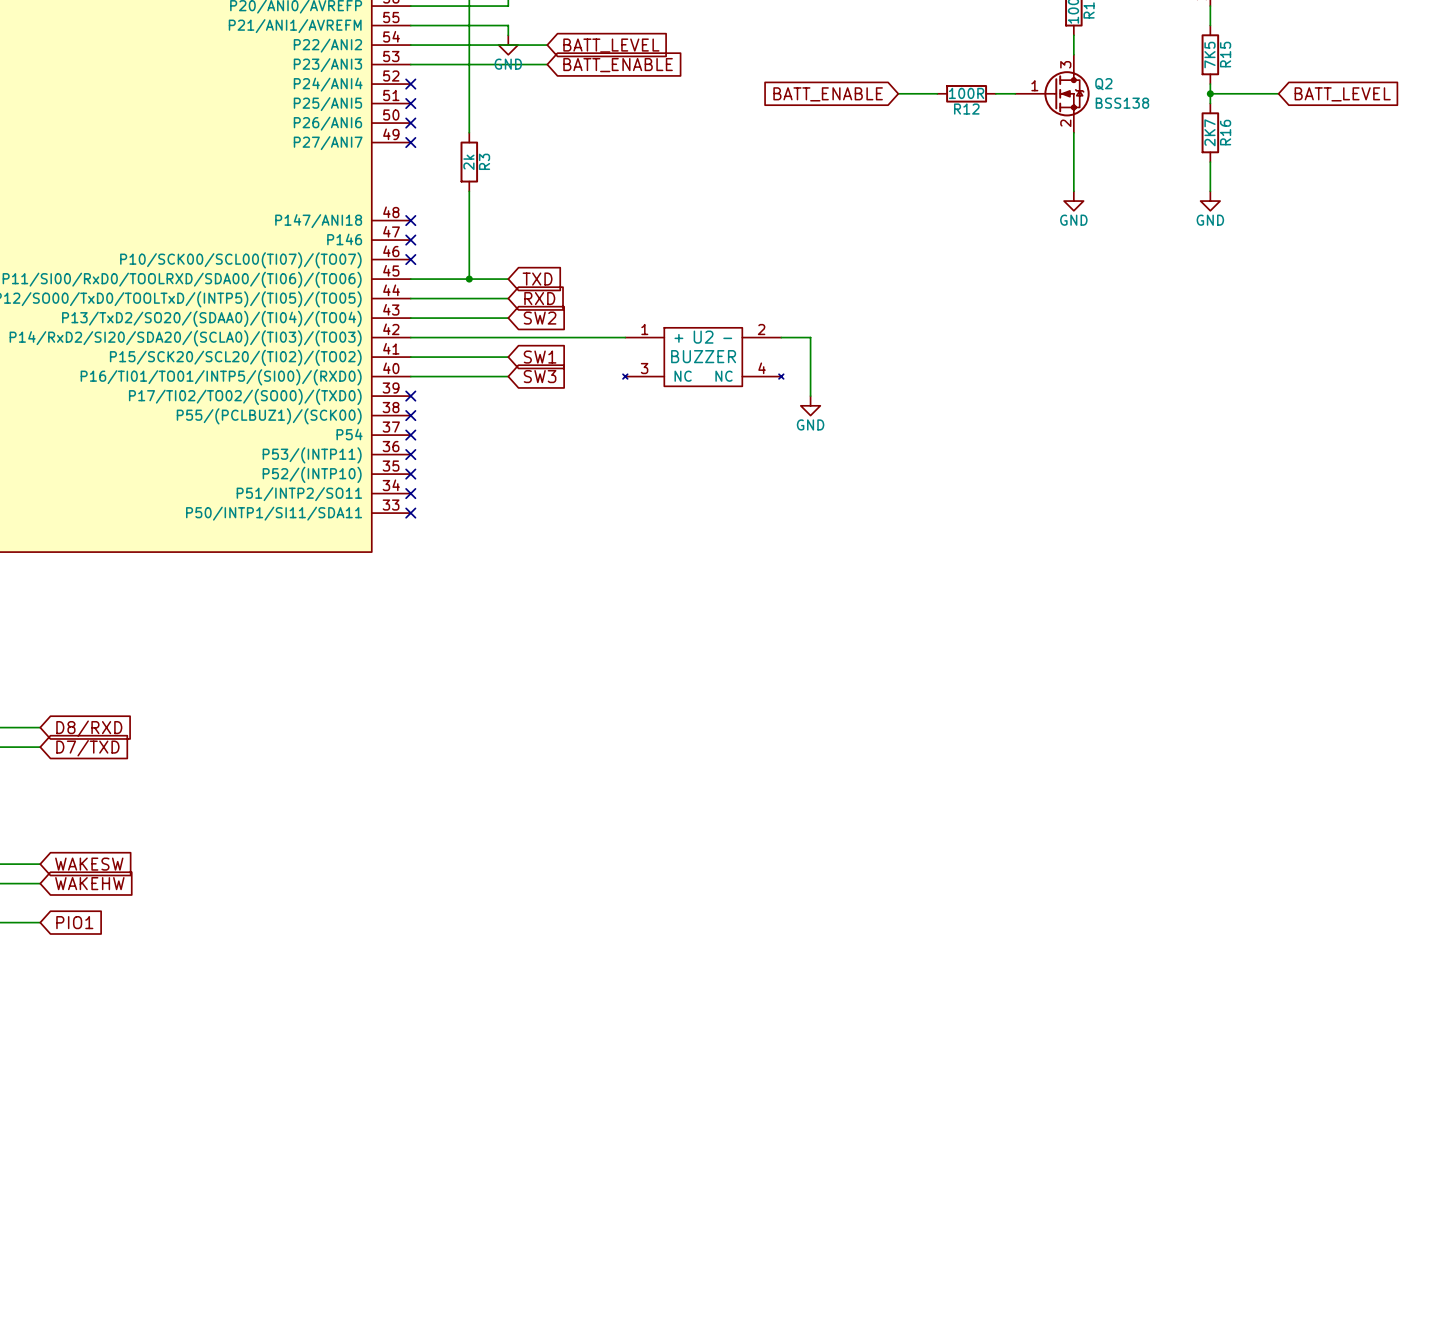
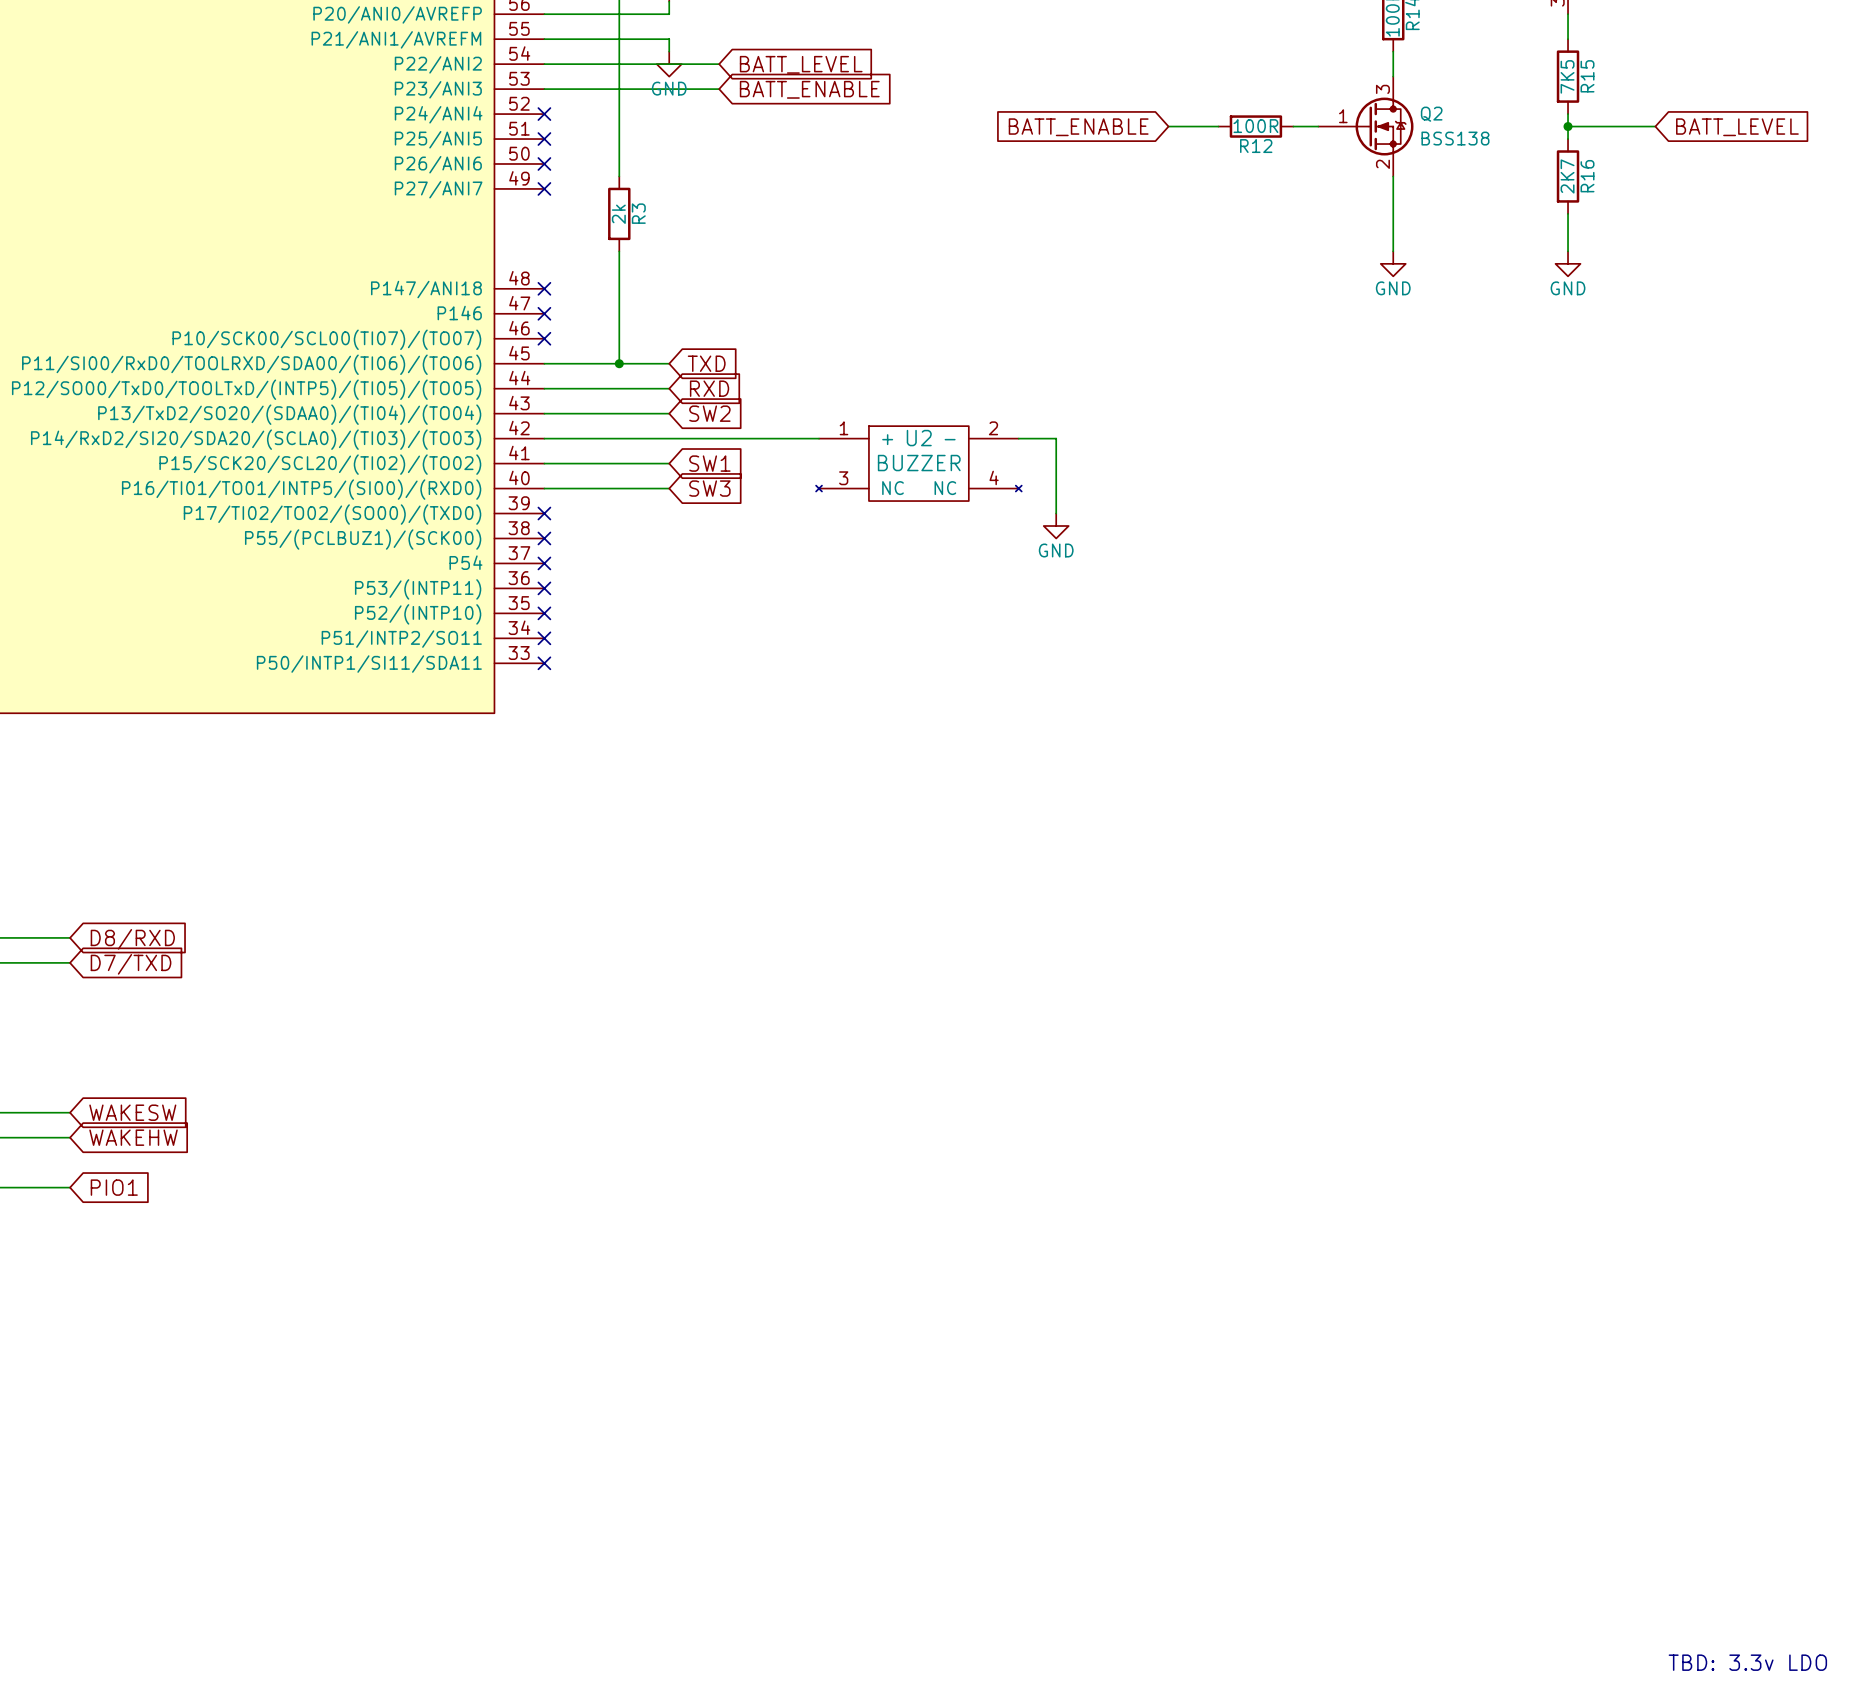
text: none -> TBD: 3.3v LDO (1747, 1662)

